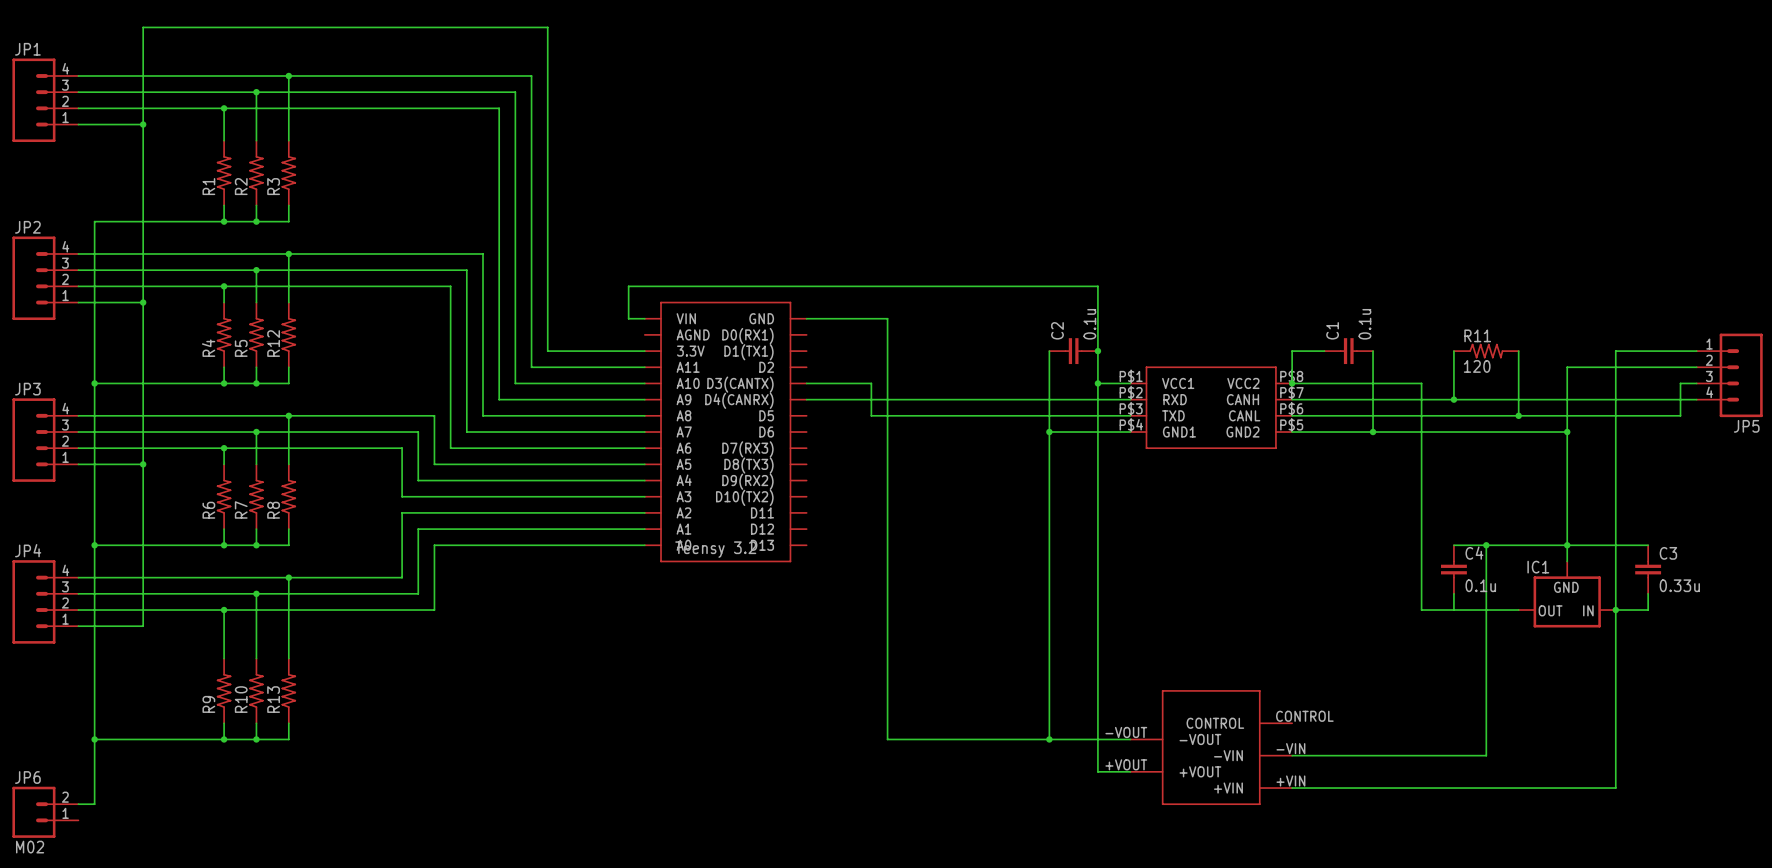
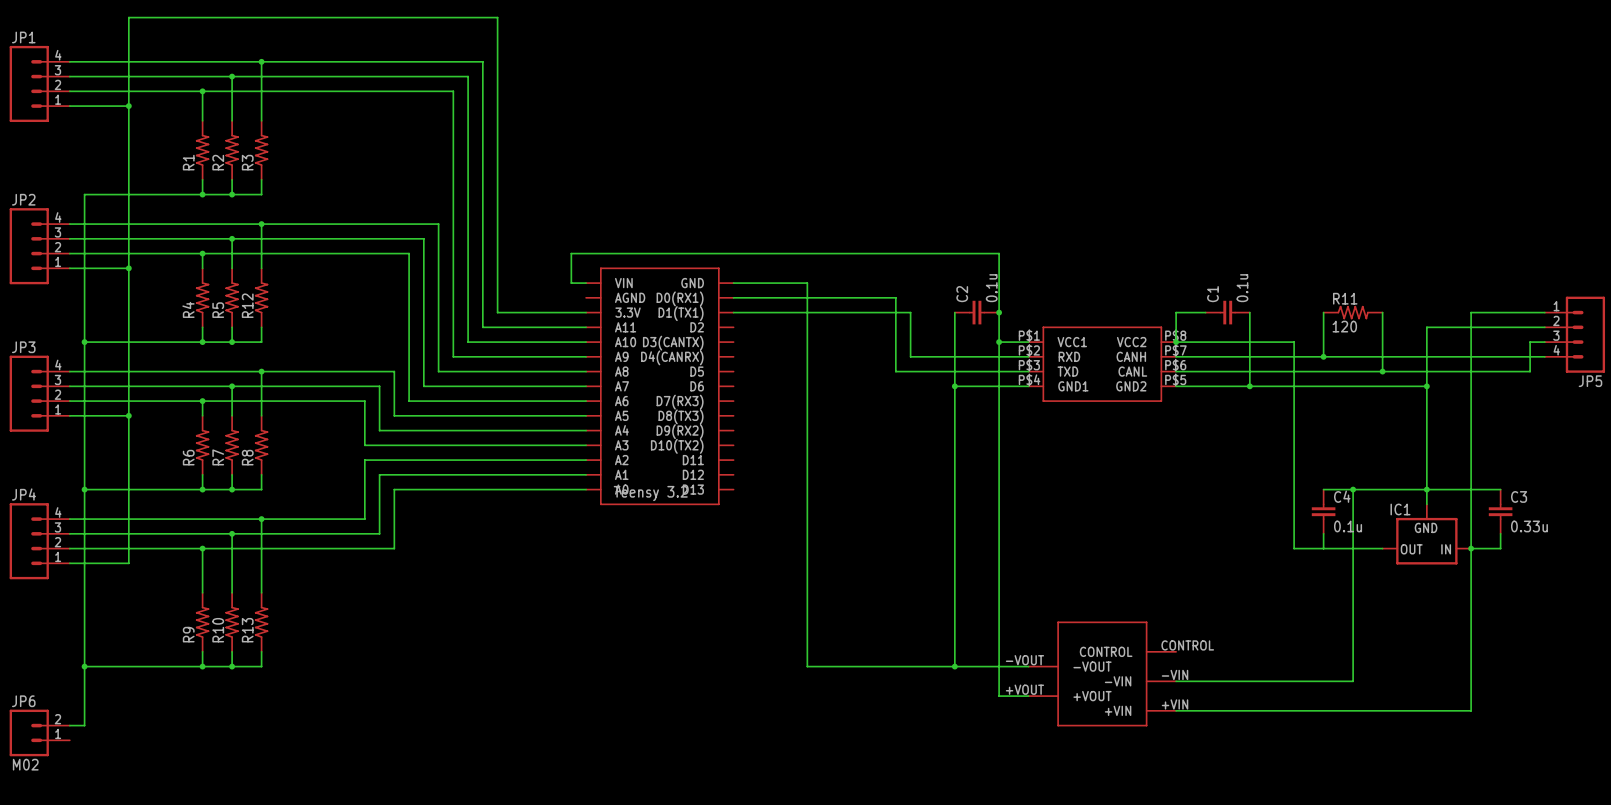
wire: (806, 383) (871, 383) (871, 415) (984, 415) -> (733, 297) (895, 297) (895, 371)
wire: (806, 399) (1000, 399) -> (733, 312) (910, 312) (910, 356)

